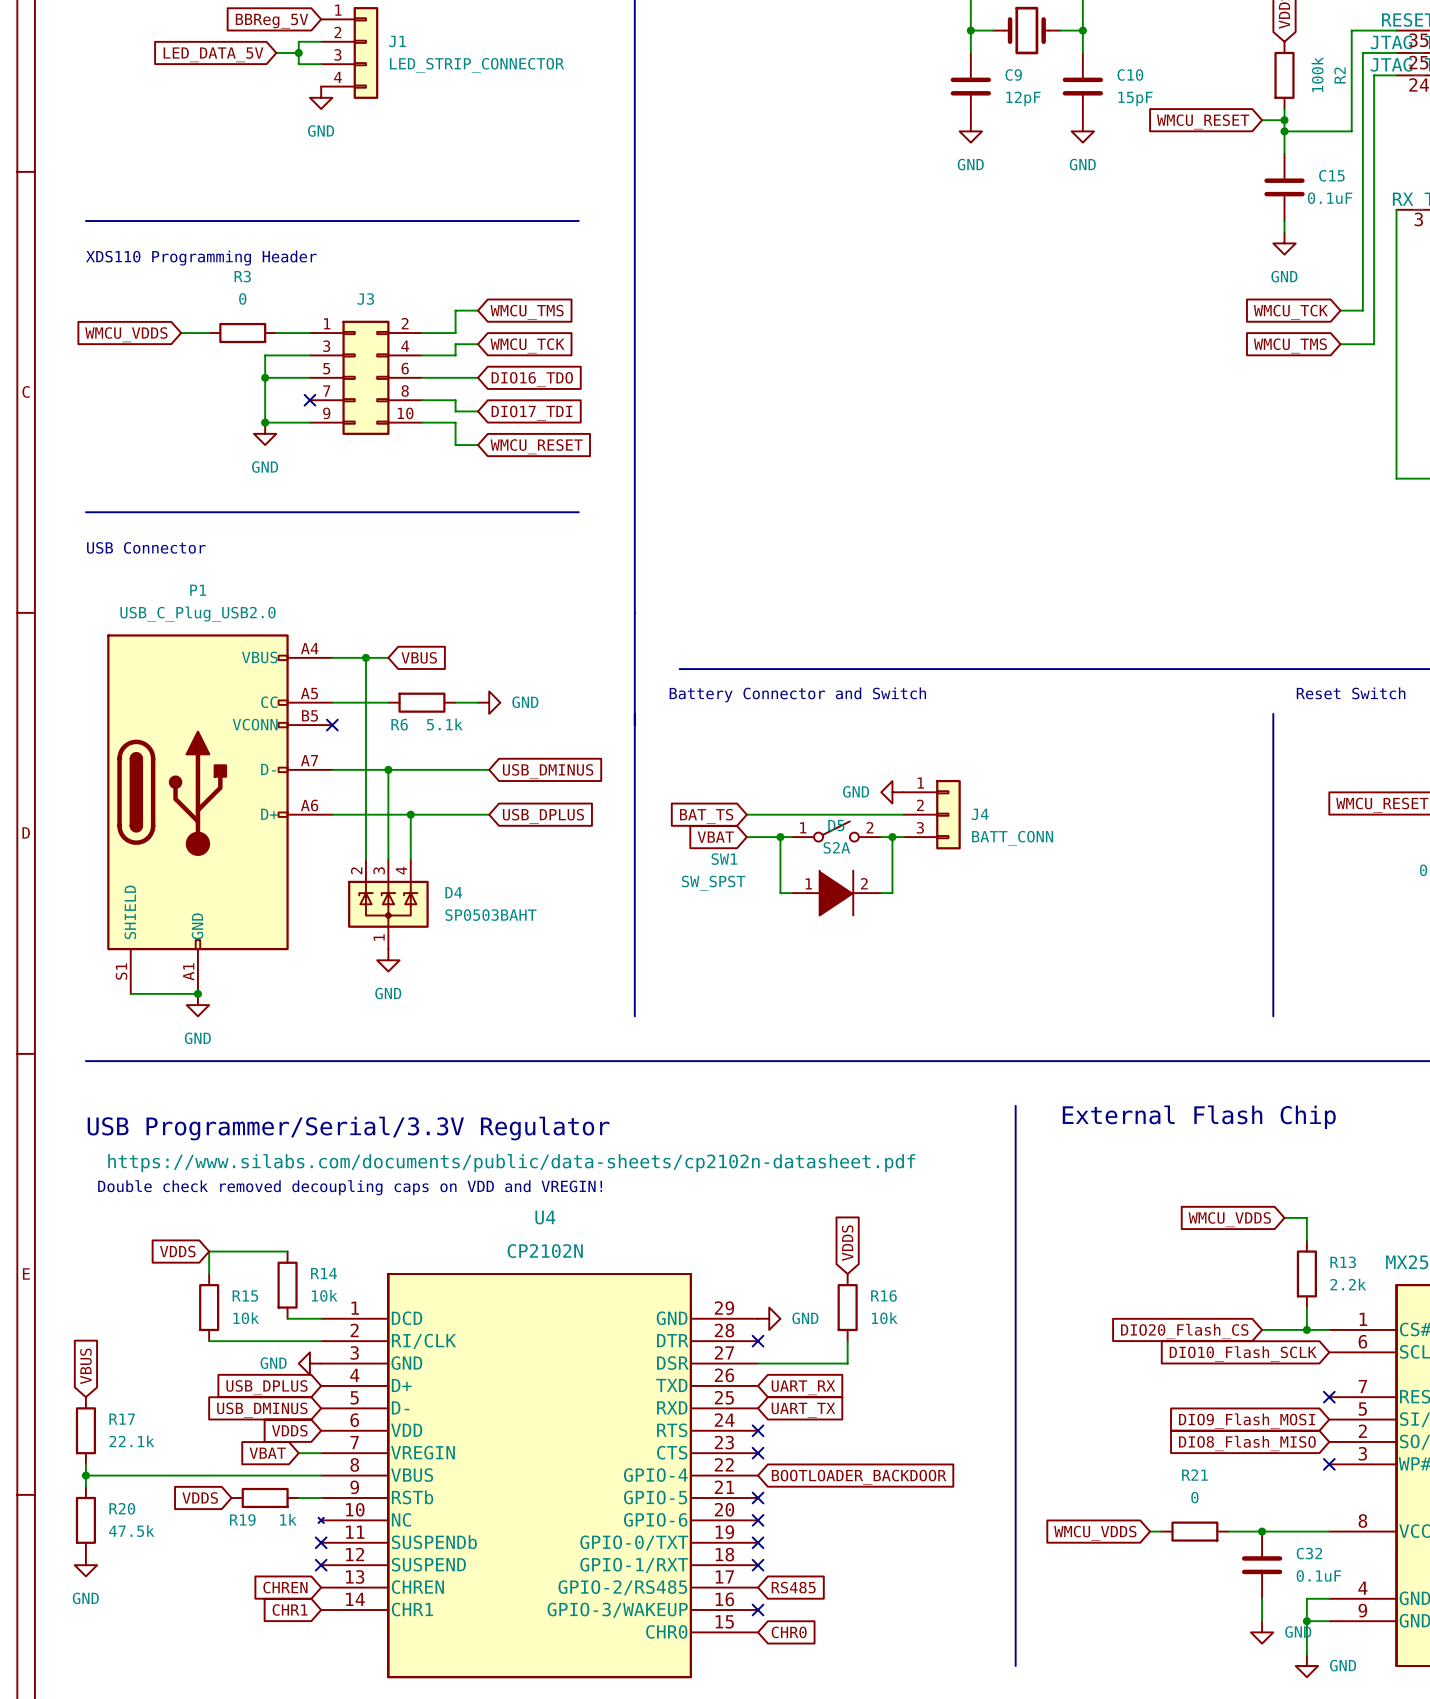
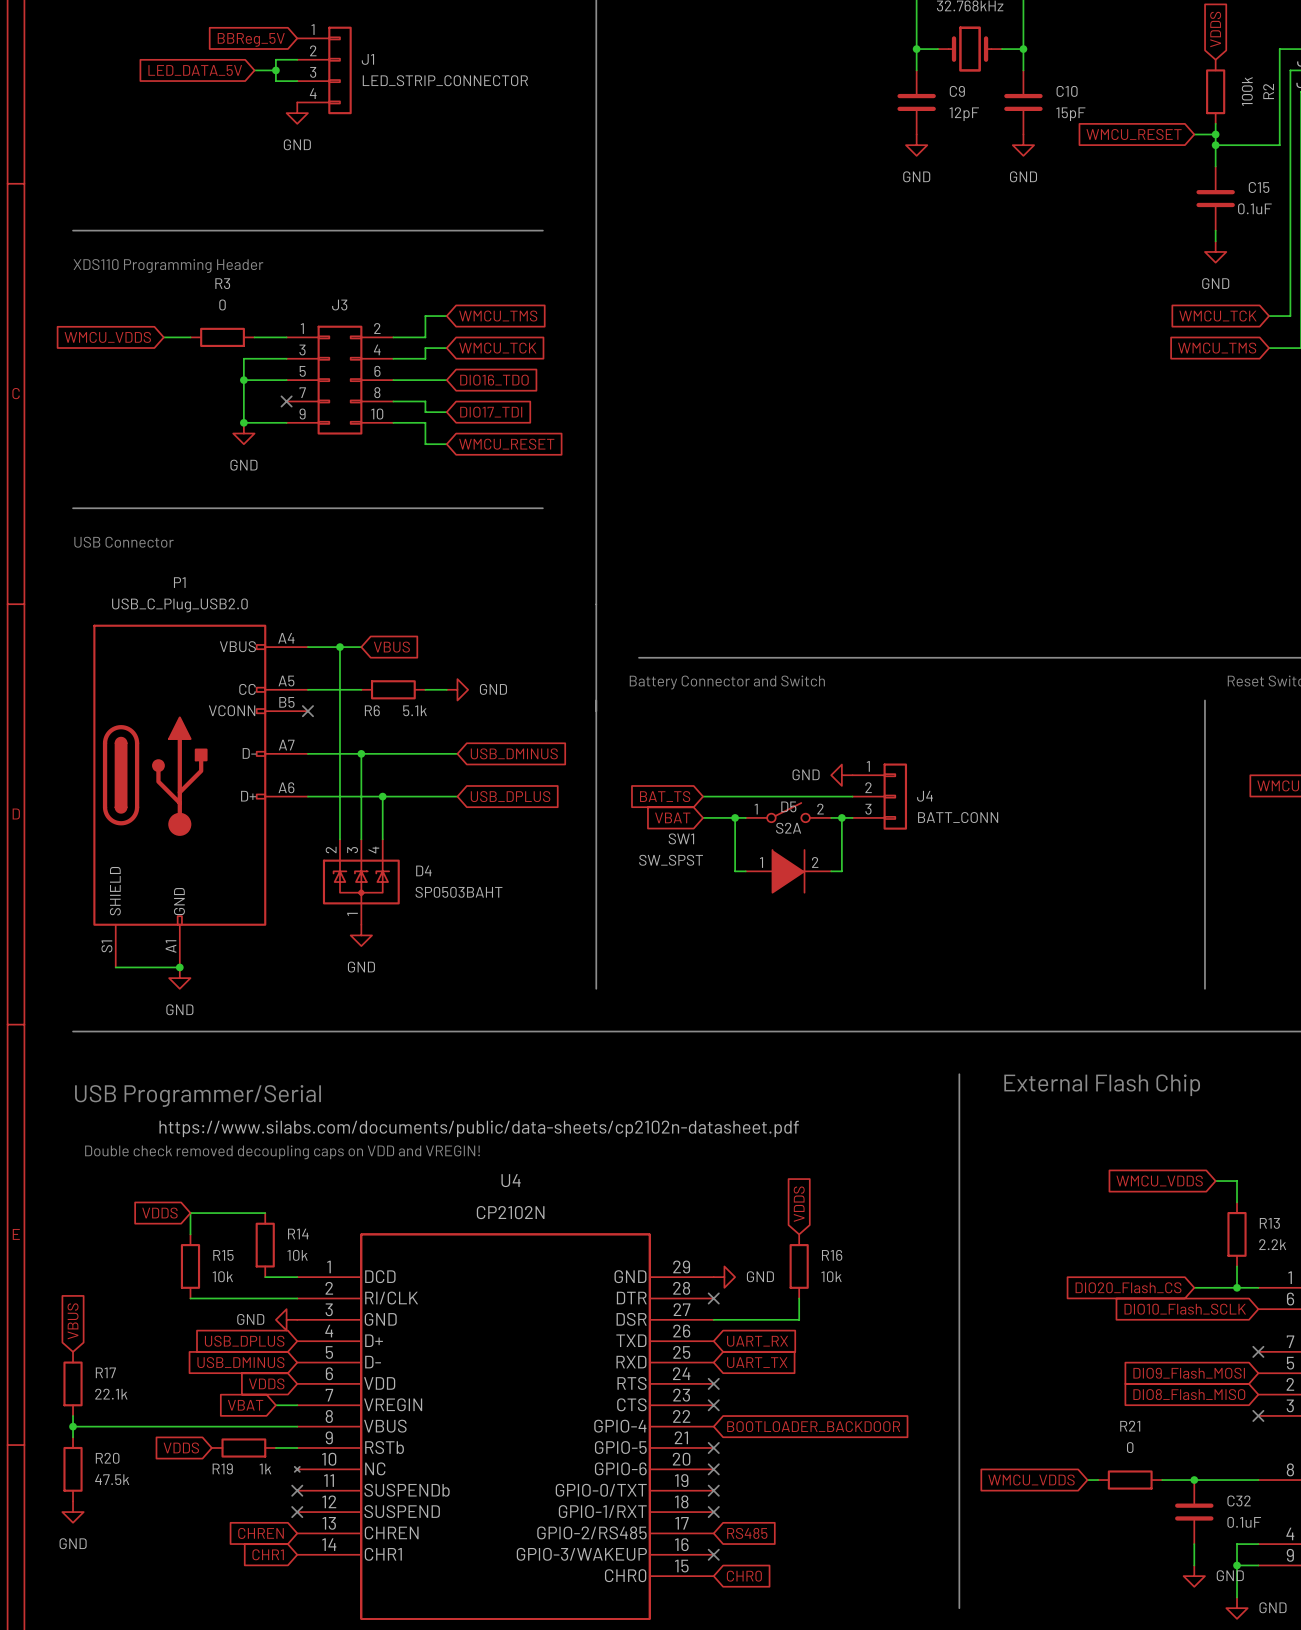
text: USB Programmer/Serial/3.3V Regulator (348, 1128) -> USB Programmer/Serial (198, 1095)

